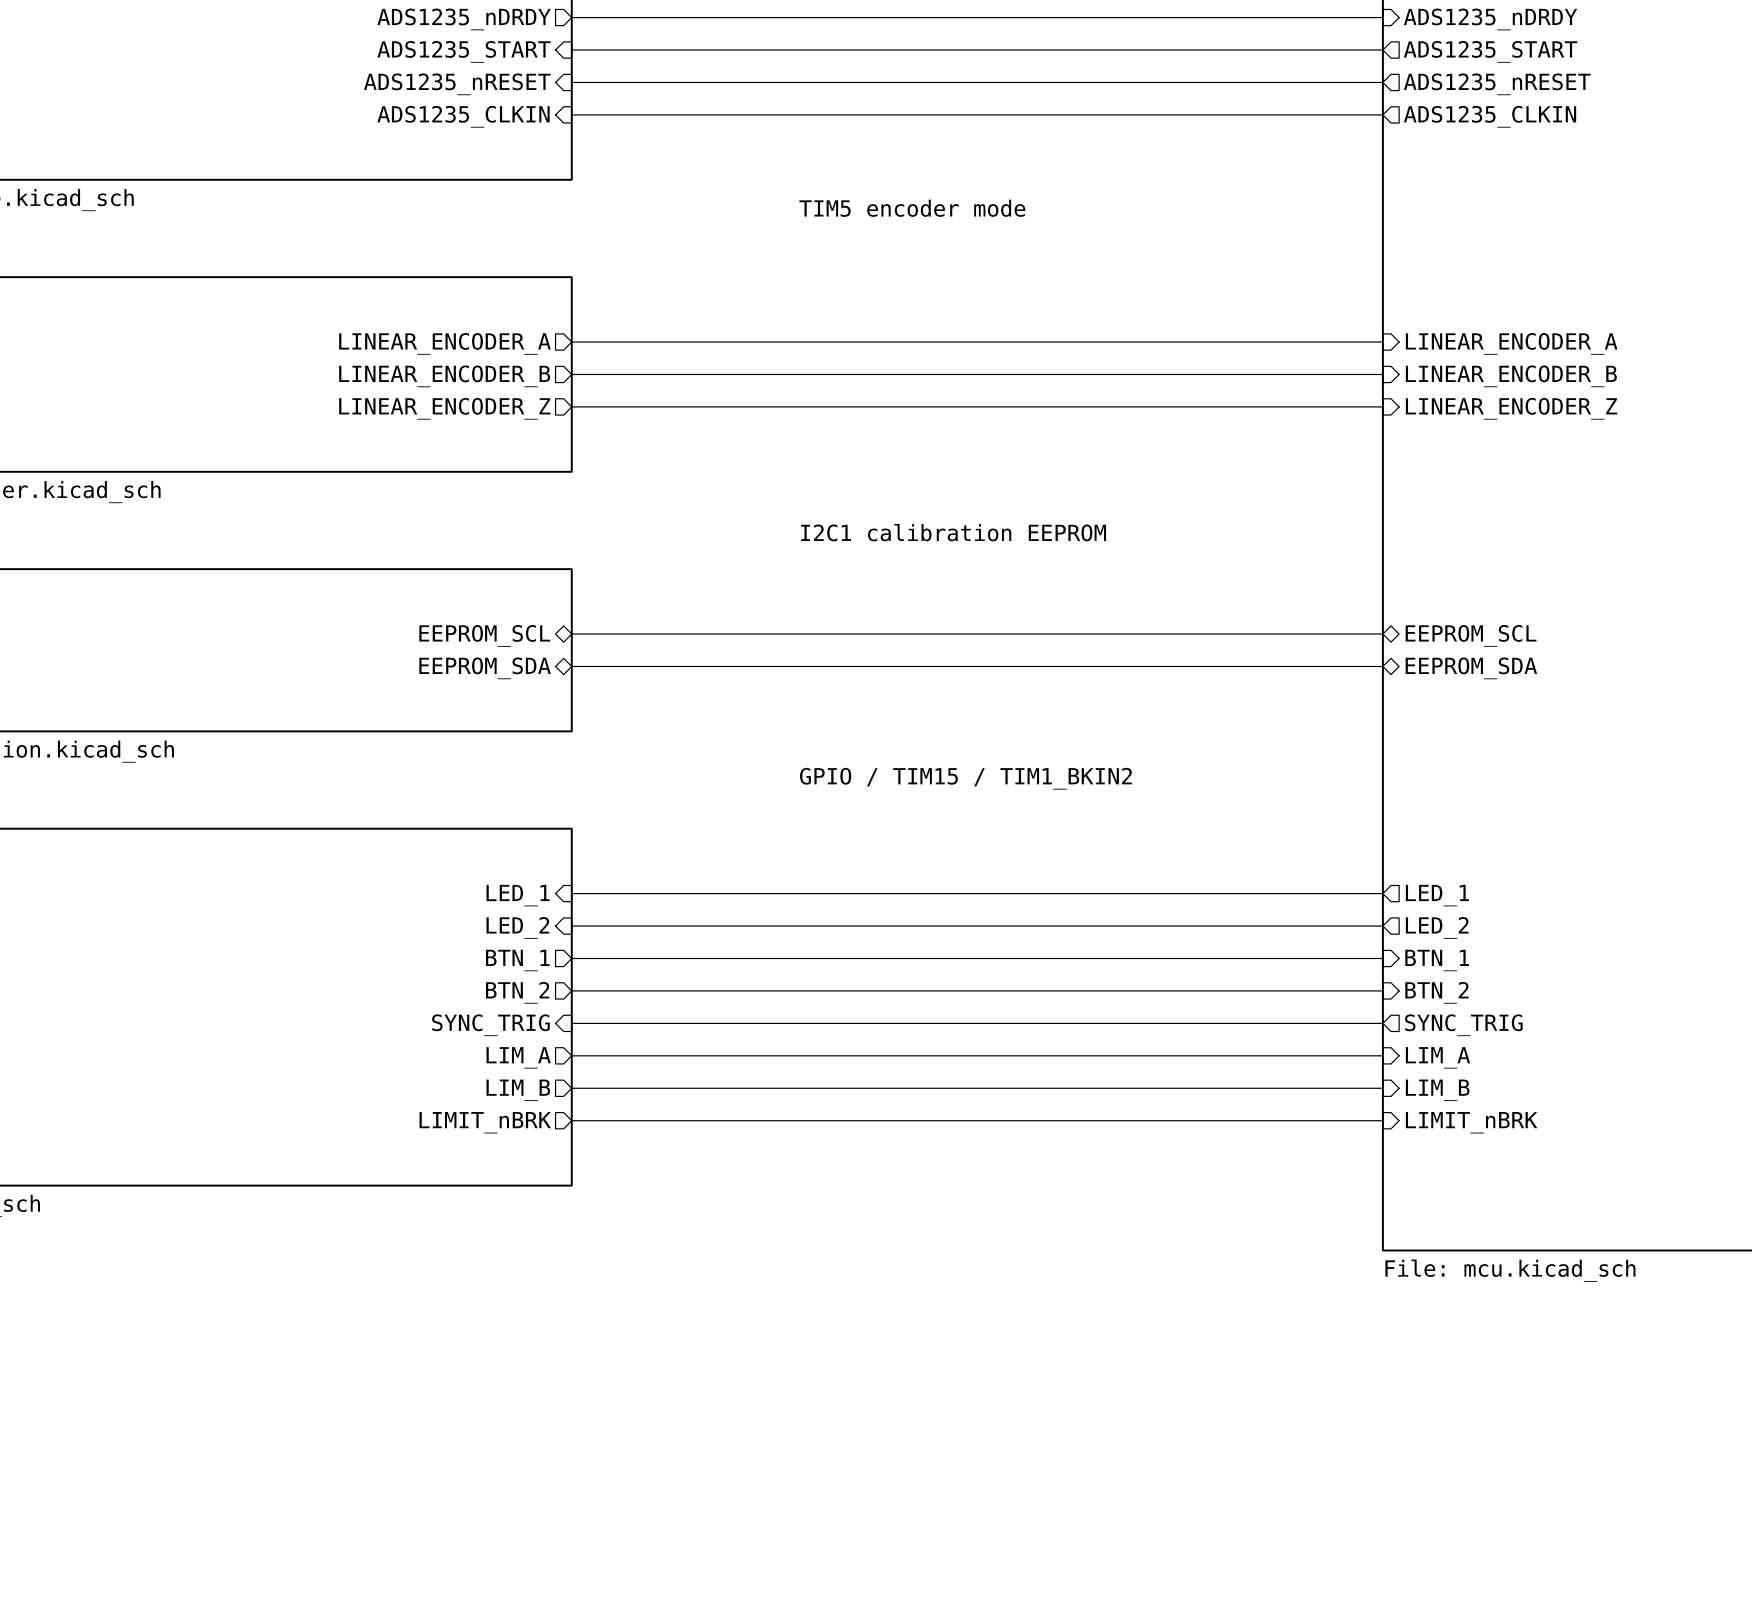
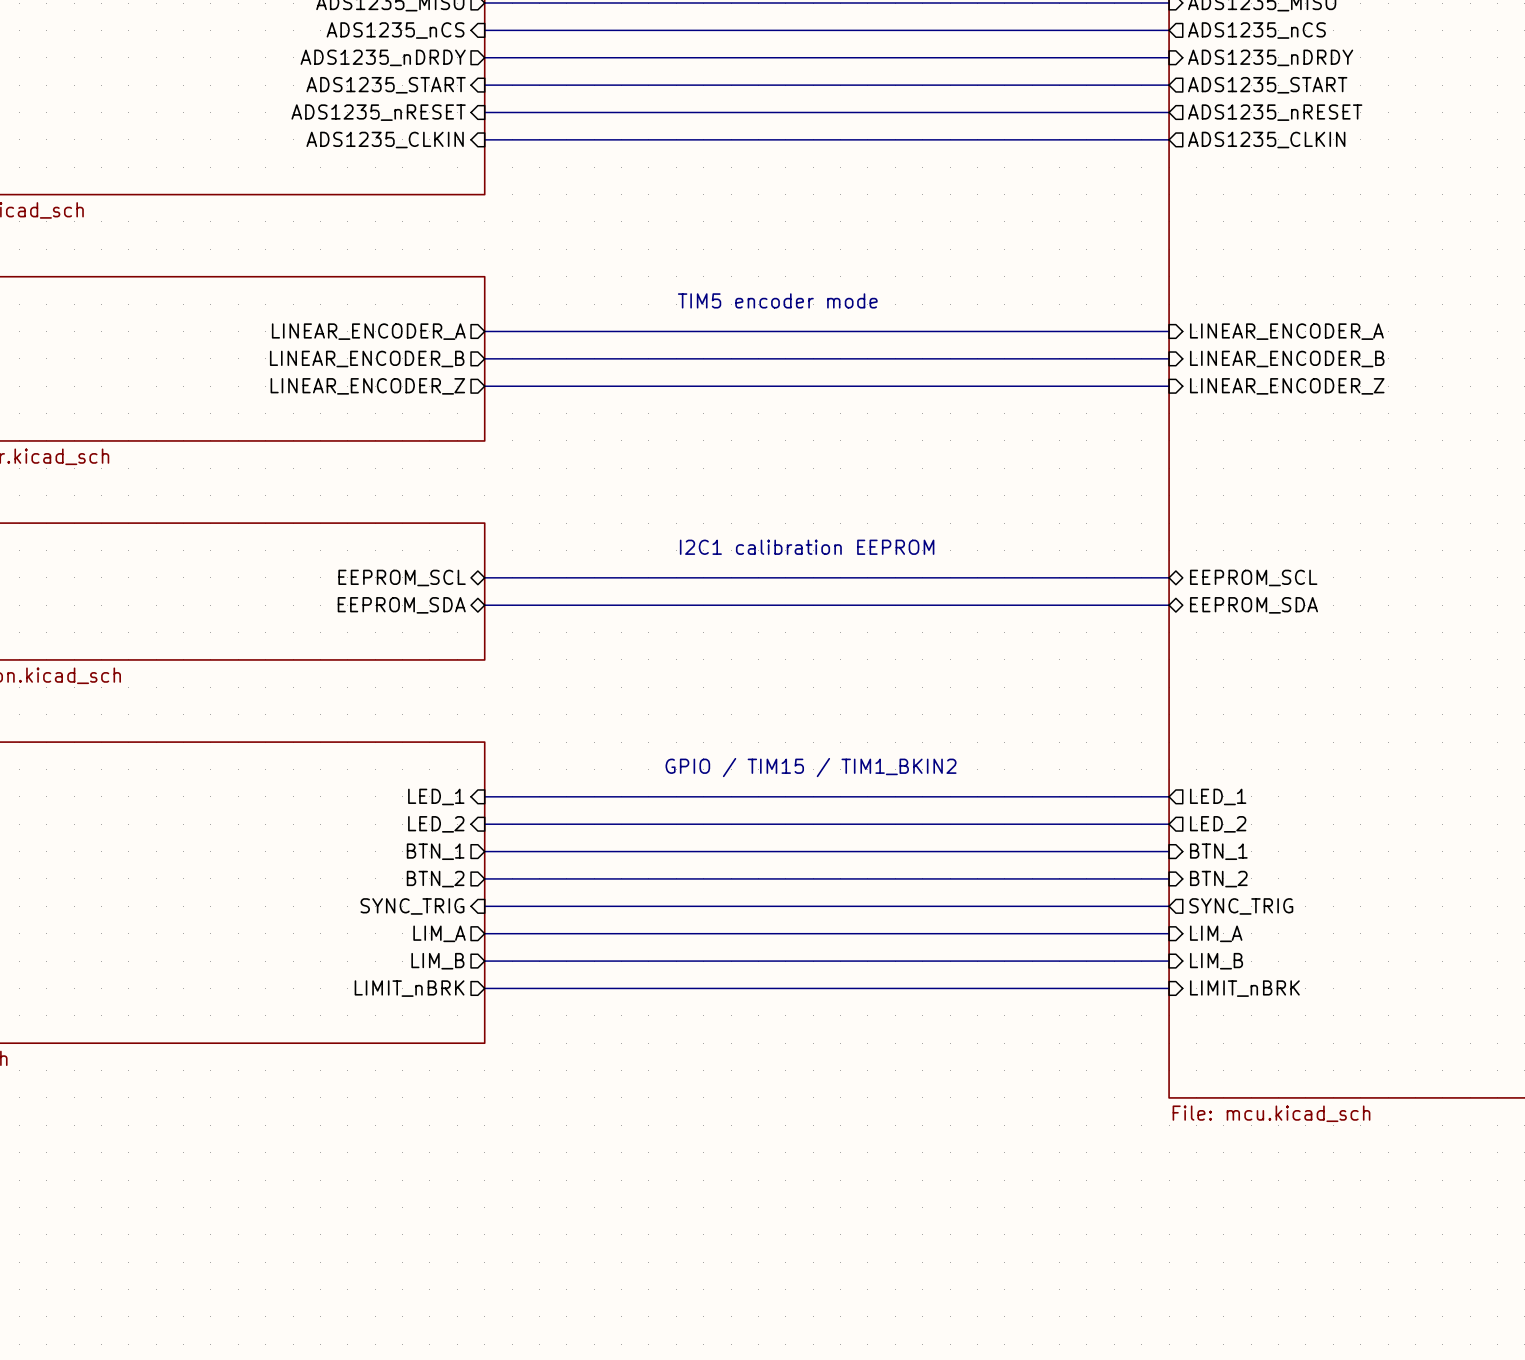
text position: TIM5 encoder mode (912, 208) -> TIM5 encoder mode (777, 300)
text position: I2C1 calibration EEPROM (953, 532) -> I2C1 calibration EEPROM (807, 547)
text position: GPIO / TIM15 / TIM1_BKIN2 (965, 778) -> GPIO / TIM15 / TIM1_BKIN2 (811, 767)

